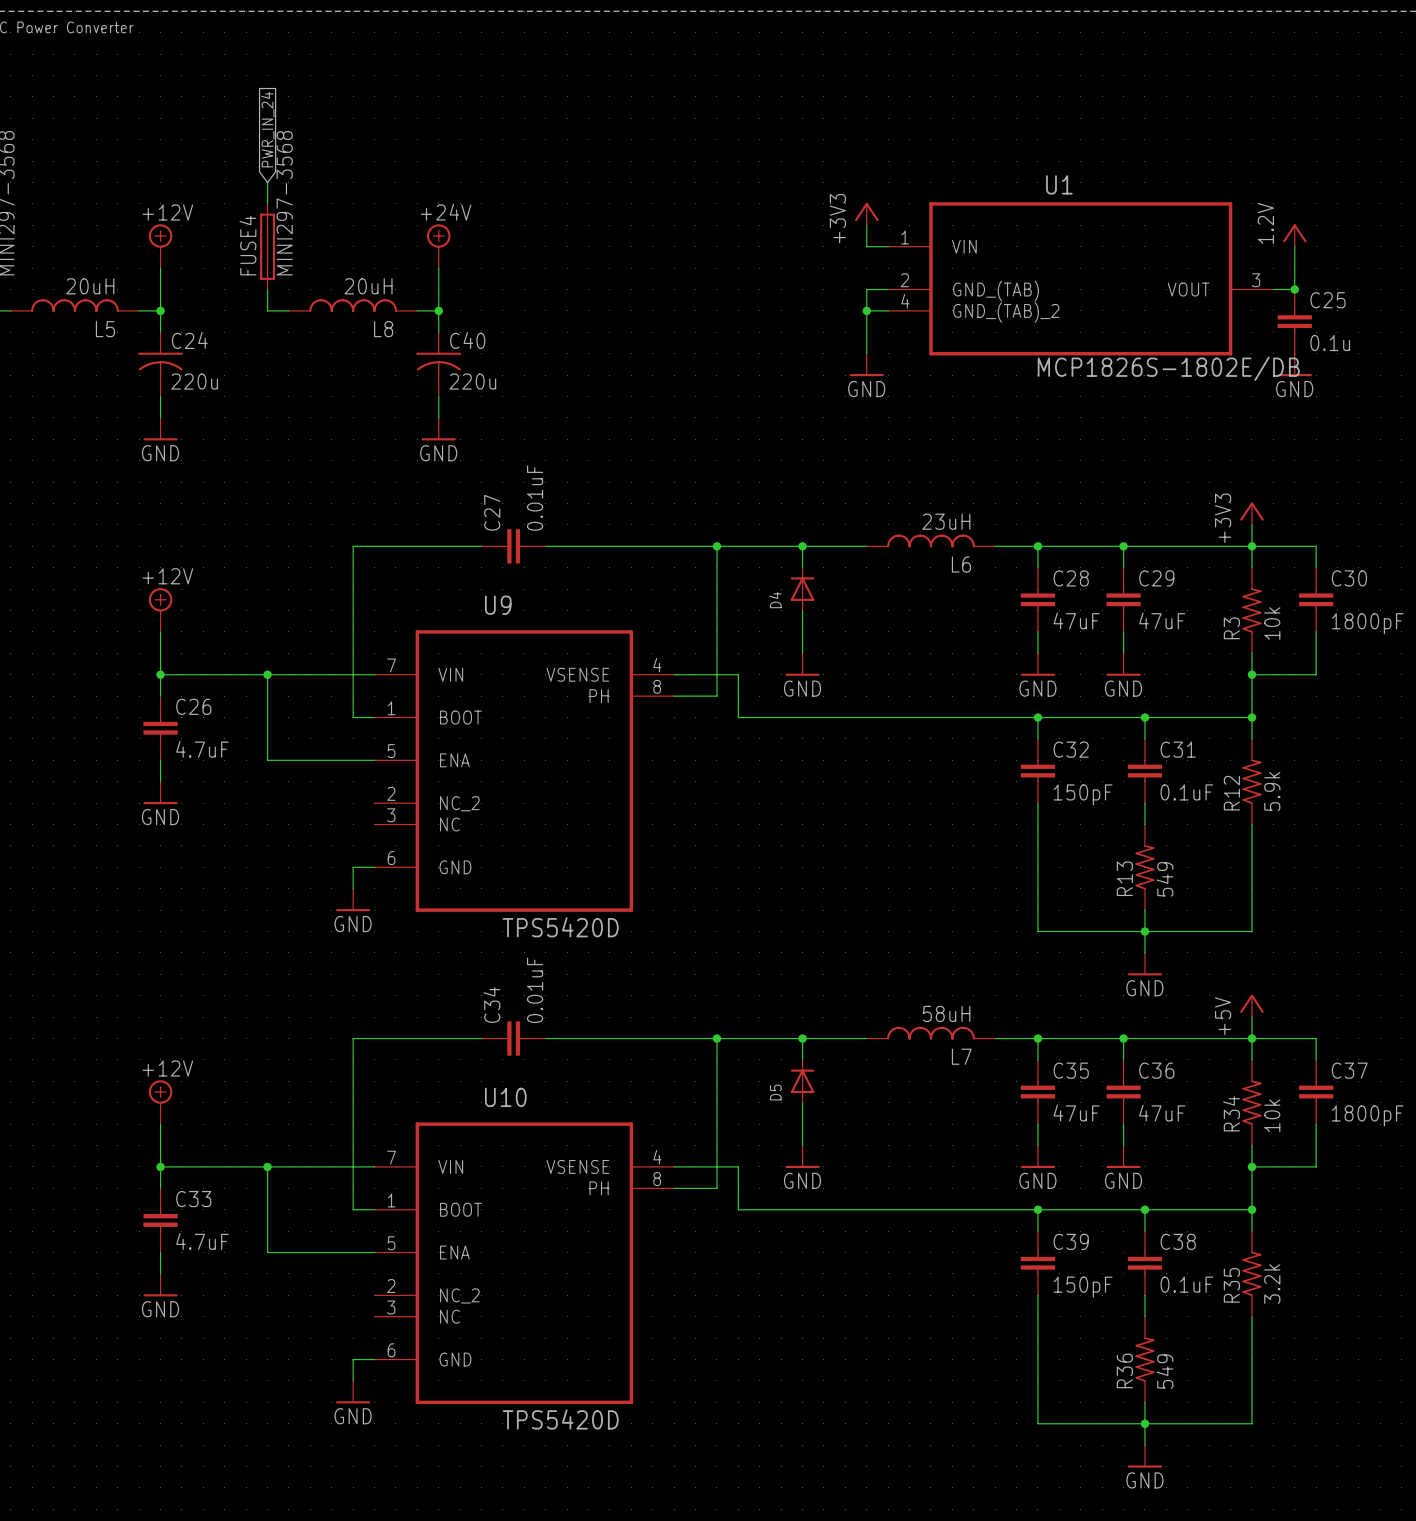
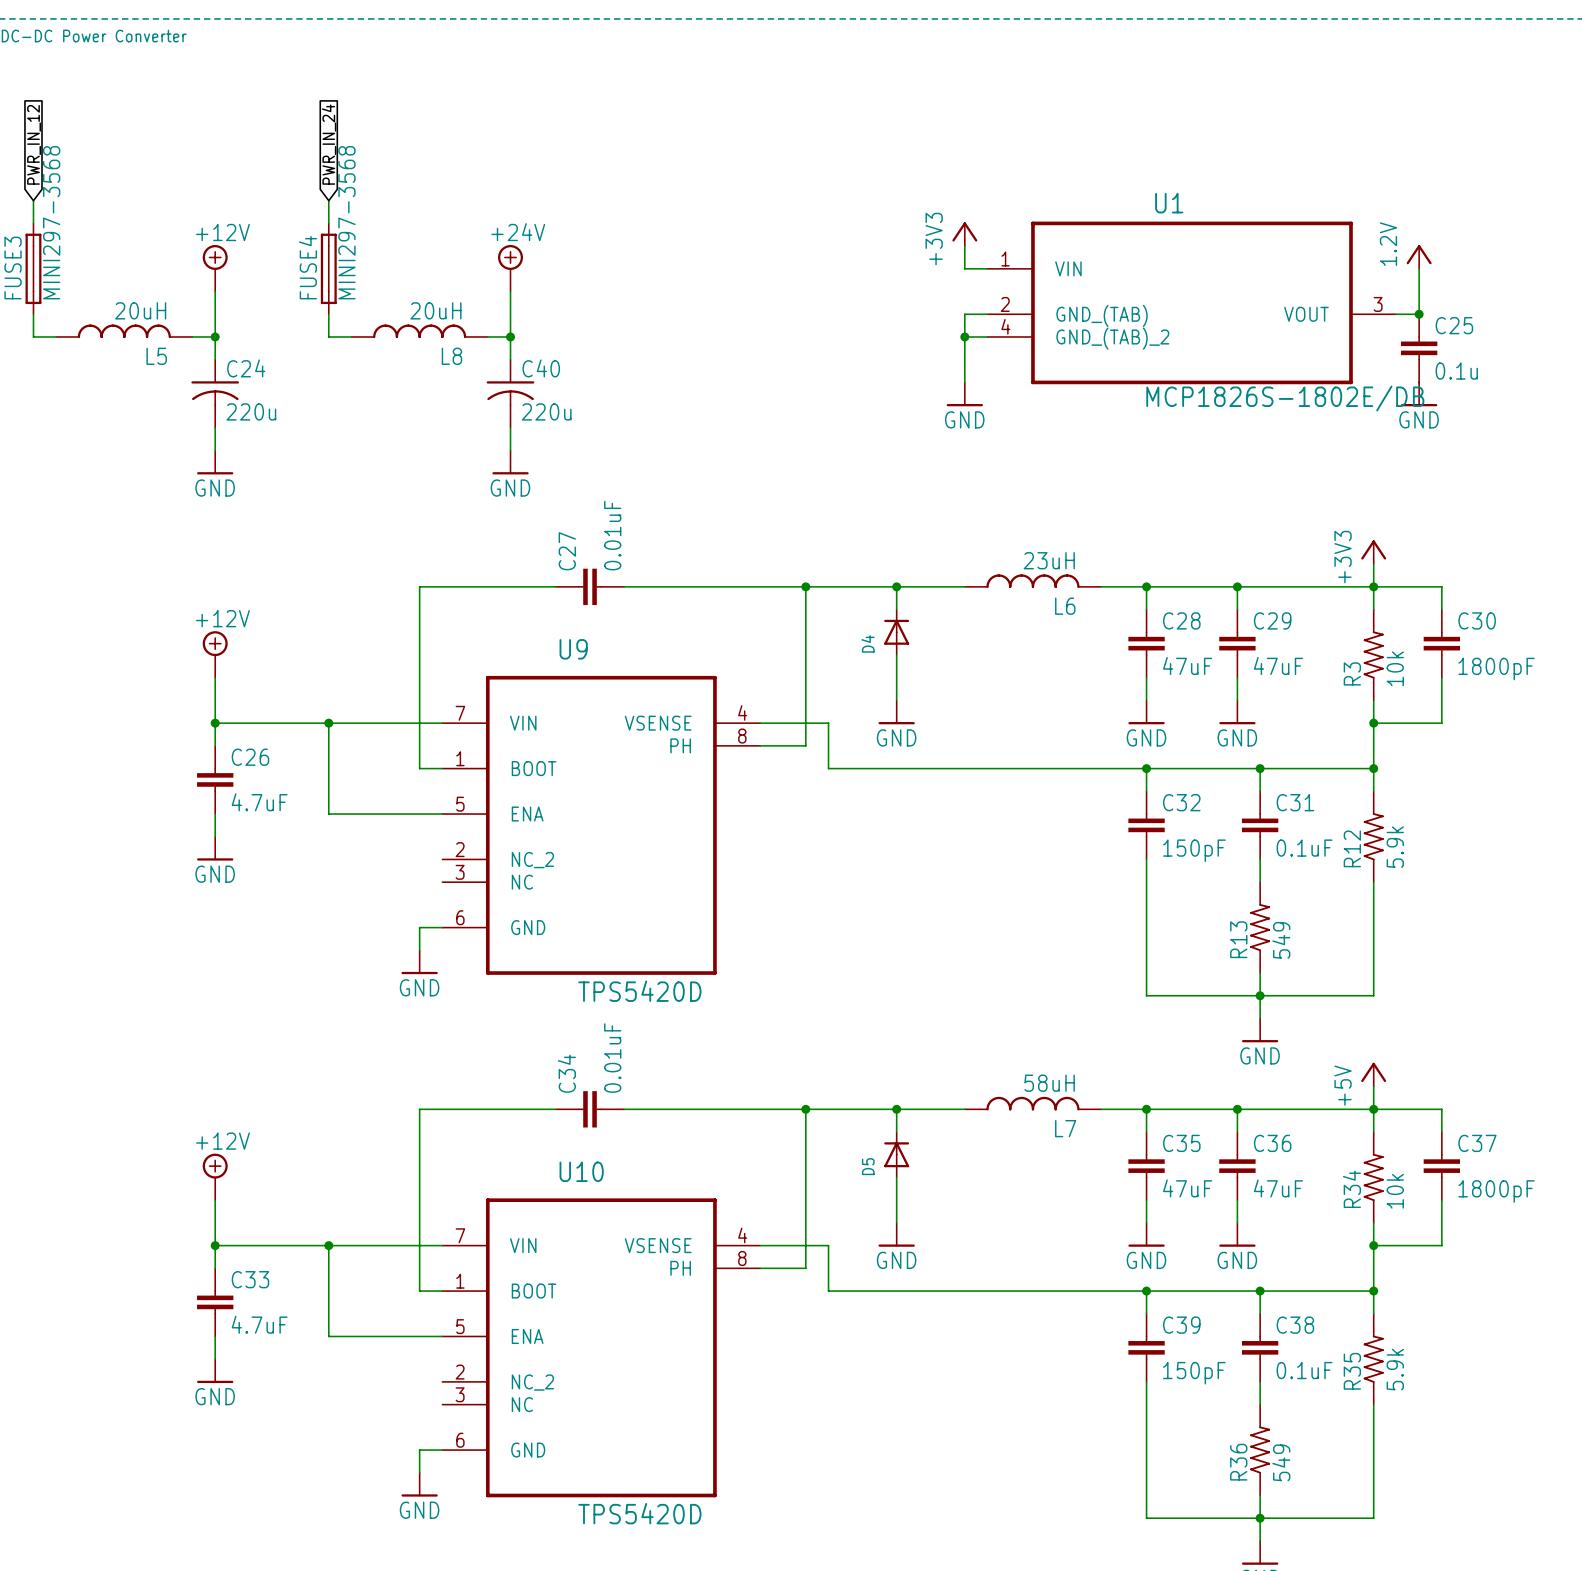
R35 value: 3.2k (1272, 1284) -> 5.9k (1395, 1369)

